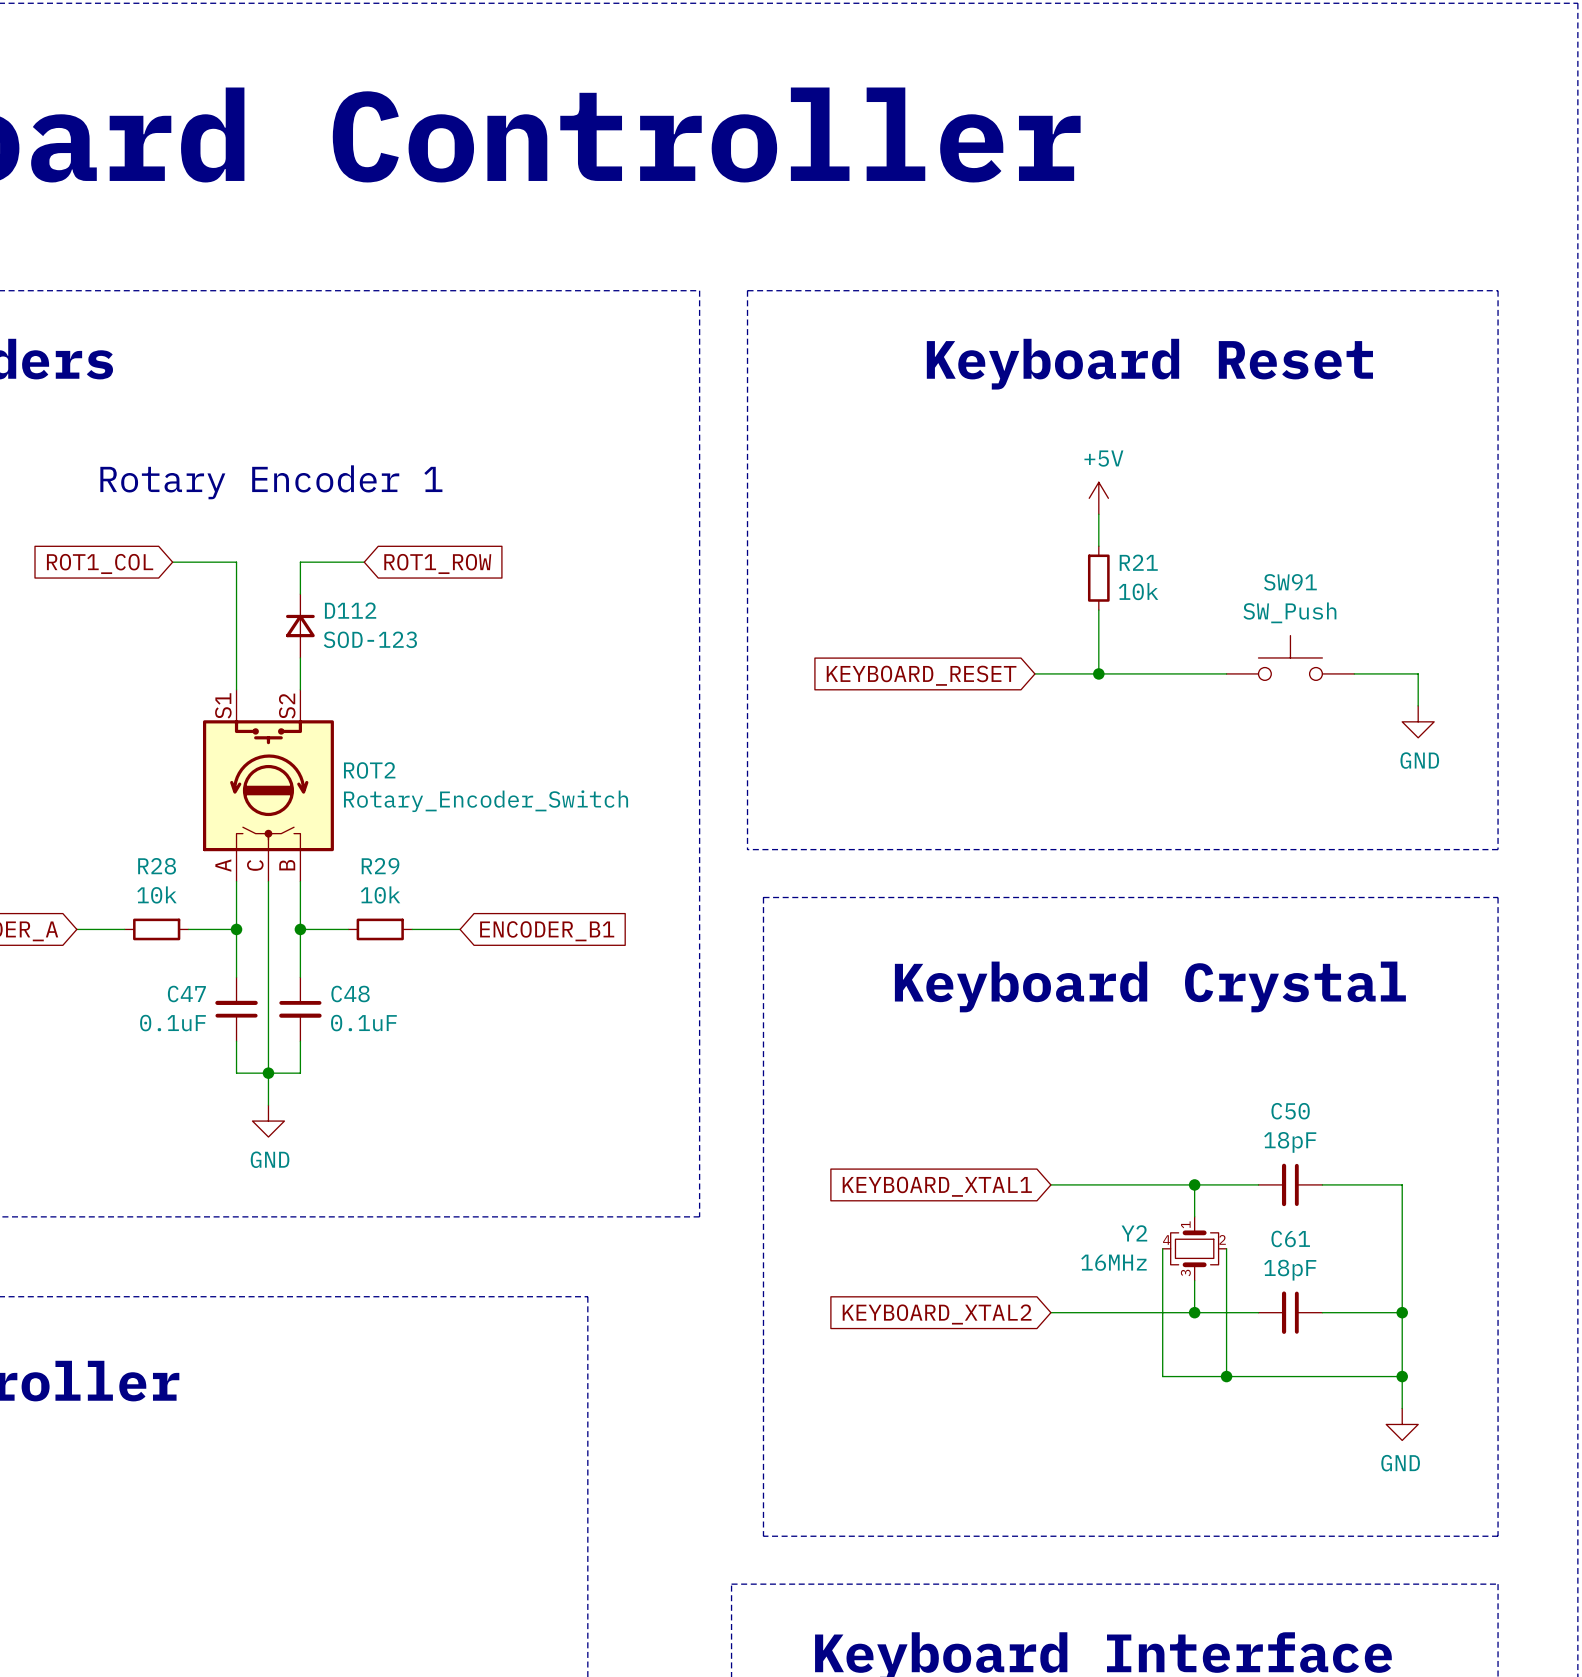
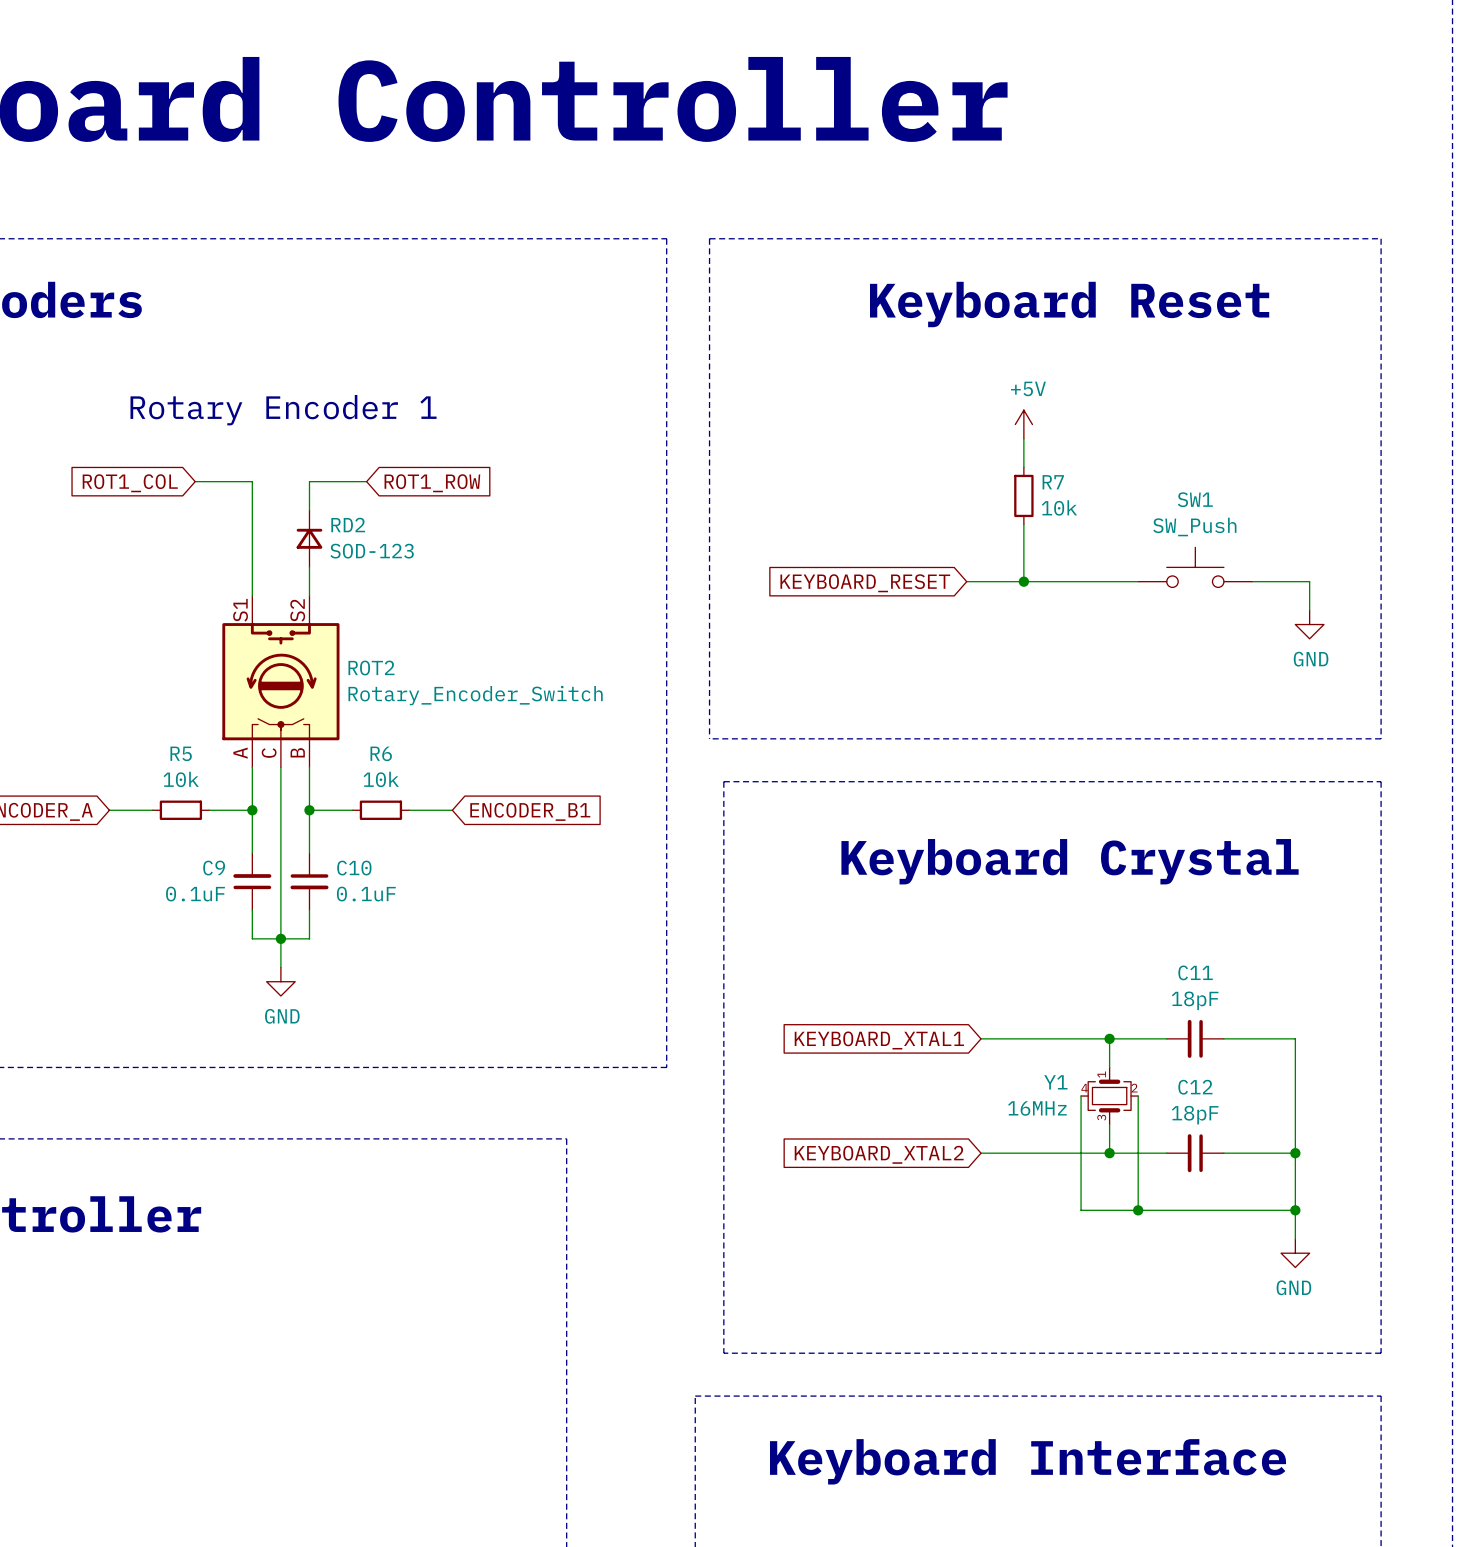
R21 name: R21 (1138, 562) -> R7 (1053, 482)
SW91 name: SW91 (1290, 582) -> SW1 (1195, 499)
D112 name: D112 (350, 610) -> RD2 (348, 525)
R28 name: R28 (157, 866) -> R5 (181, 753)
R29 name: R29 (380, 866) -> R6 (381, 753)
C47 name: C47 (186, 993) -> C9 (214, 868)
C48 name: C48 (350, 993) -> C10 (354, 868)
C50 name: C50 (1290, 1111) -> C11 (1195, 972)
Y2 name: Y2 (1134, 1233) -> Y1 (1055, 1082)
C61 name: C61 (1290, 1238) -> C12 (1195, 1087)

